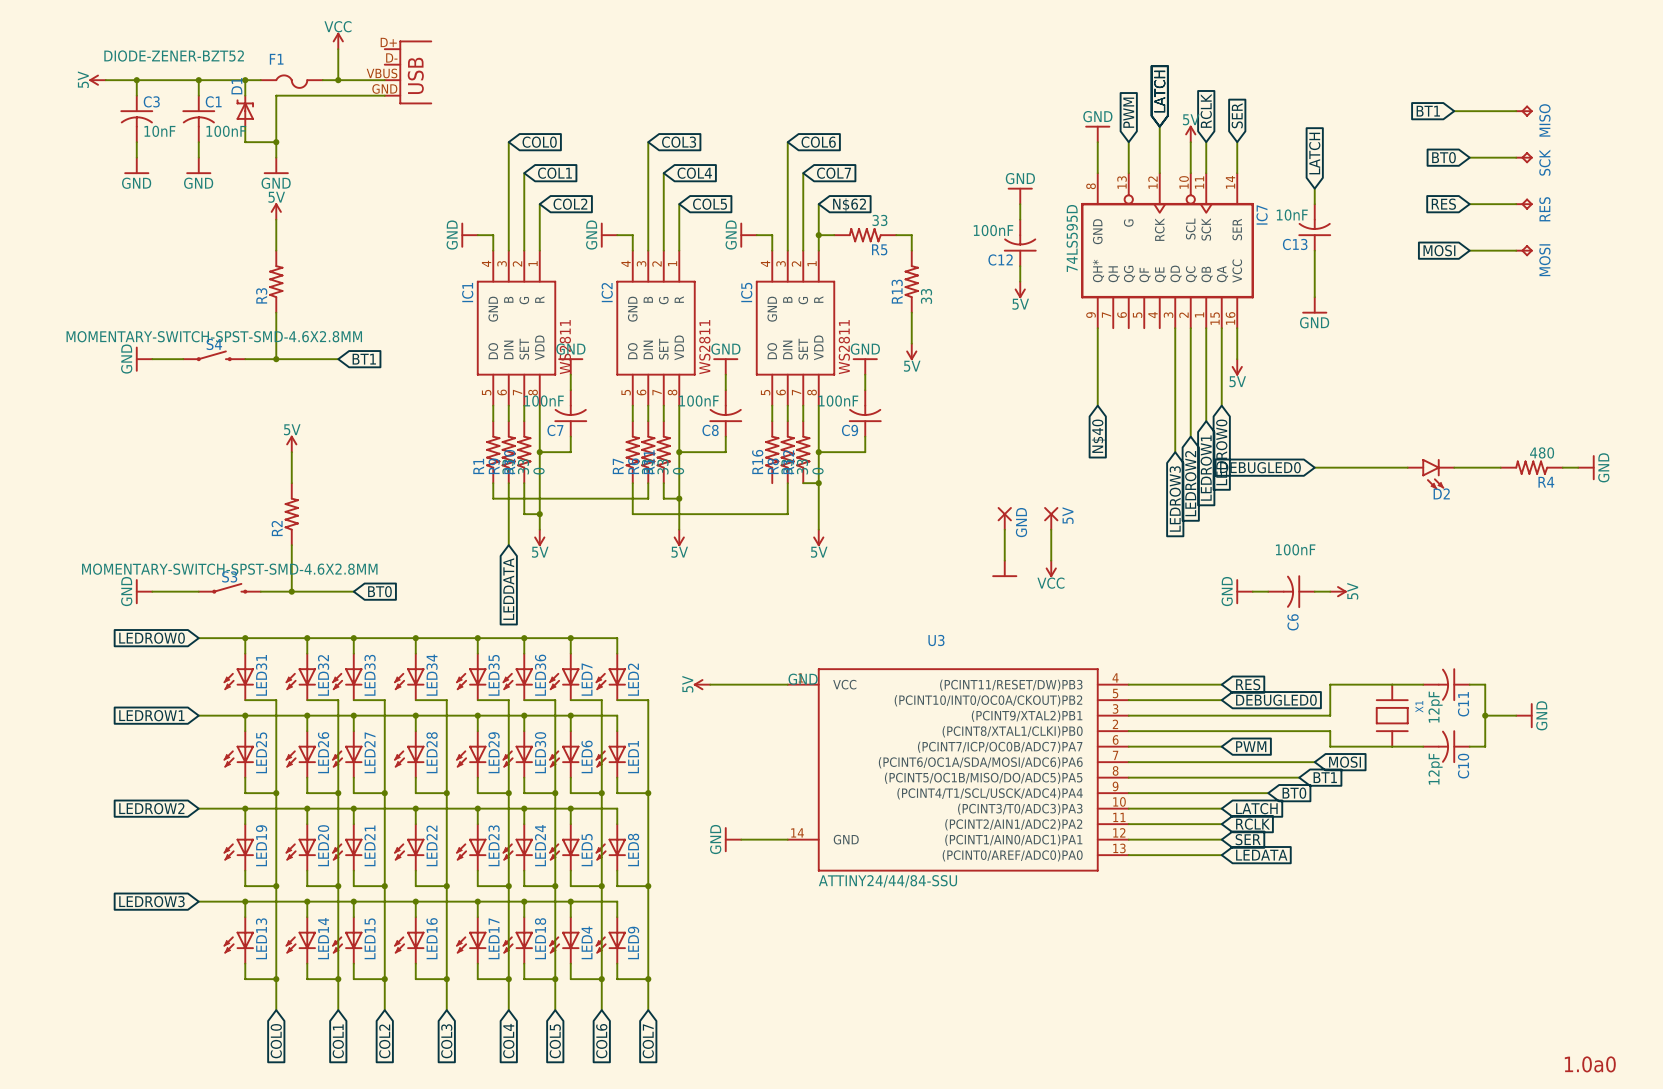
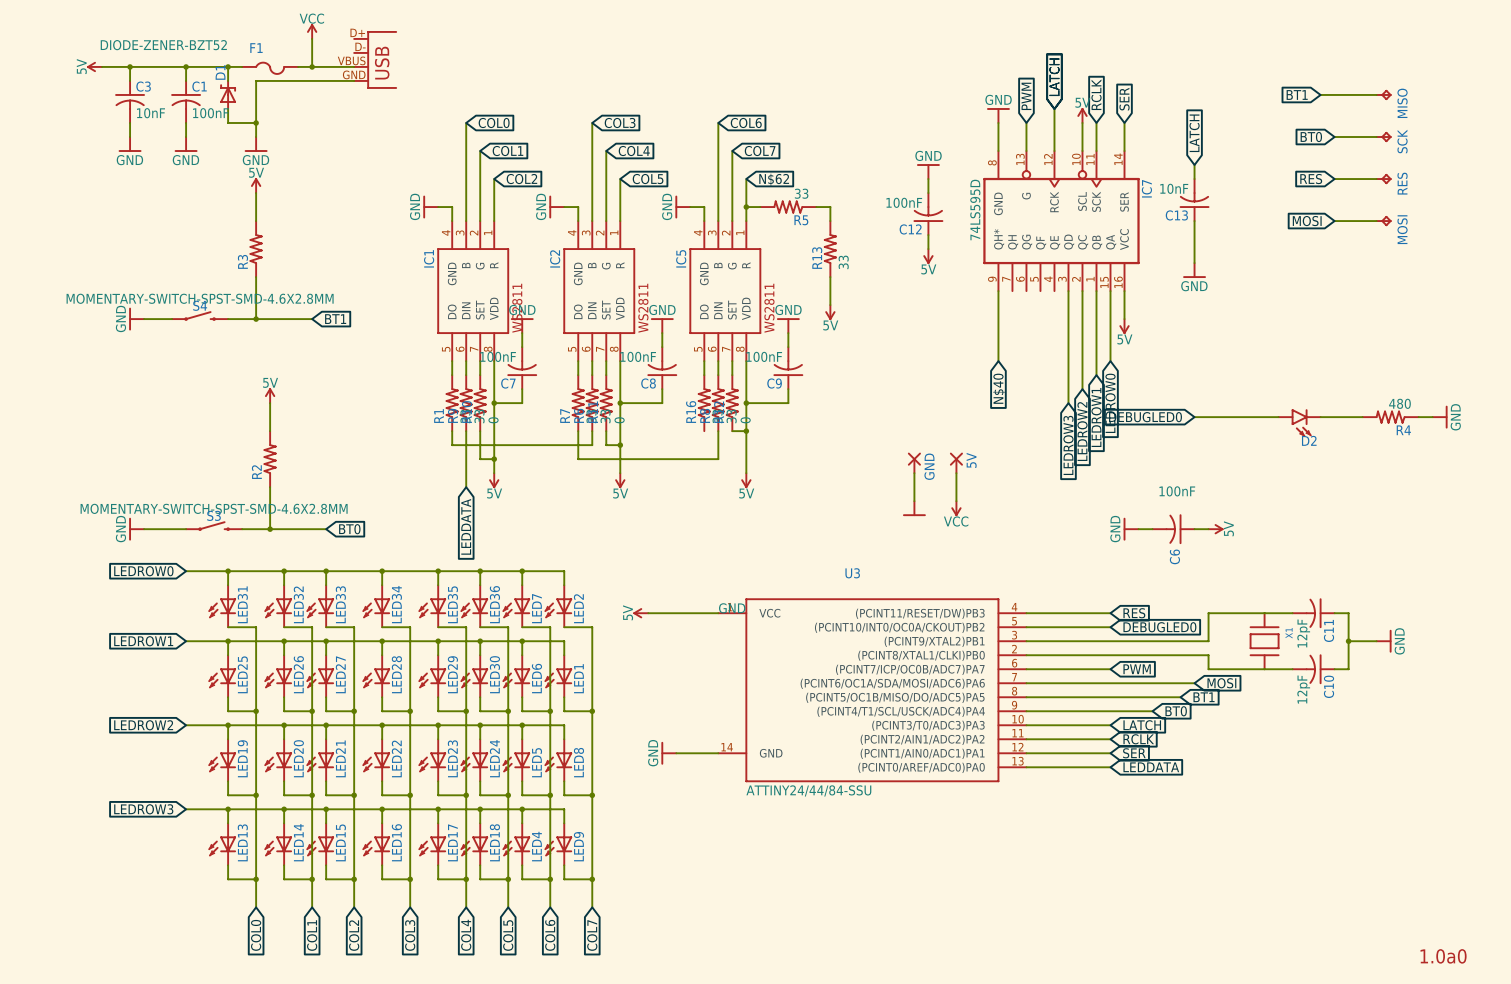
global label: LEDATA (1261, 855) -> LEDDATA (1151, 767)

